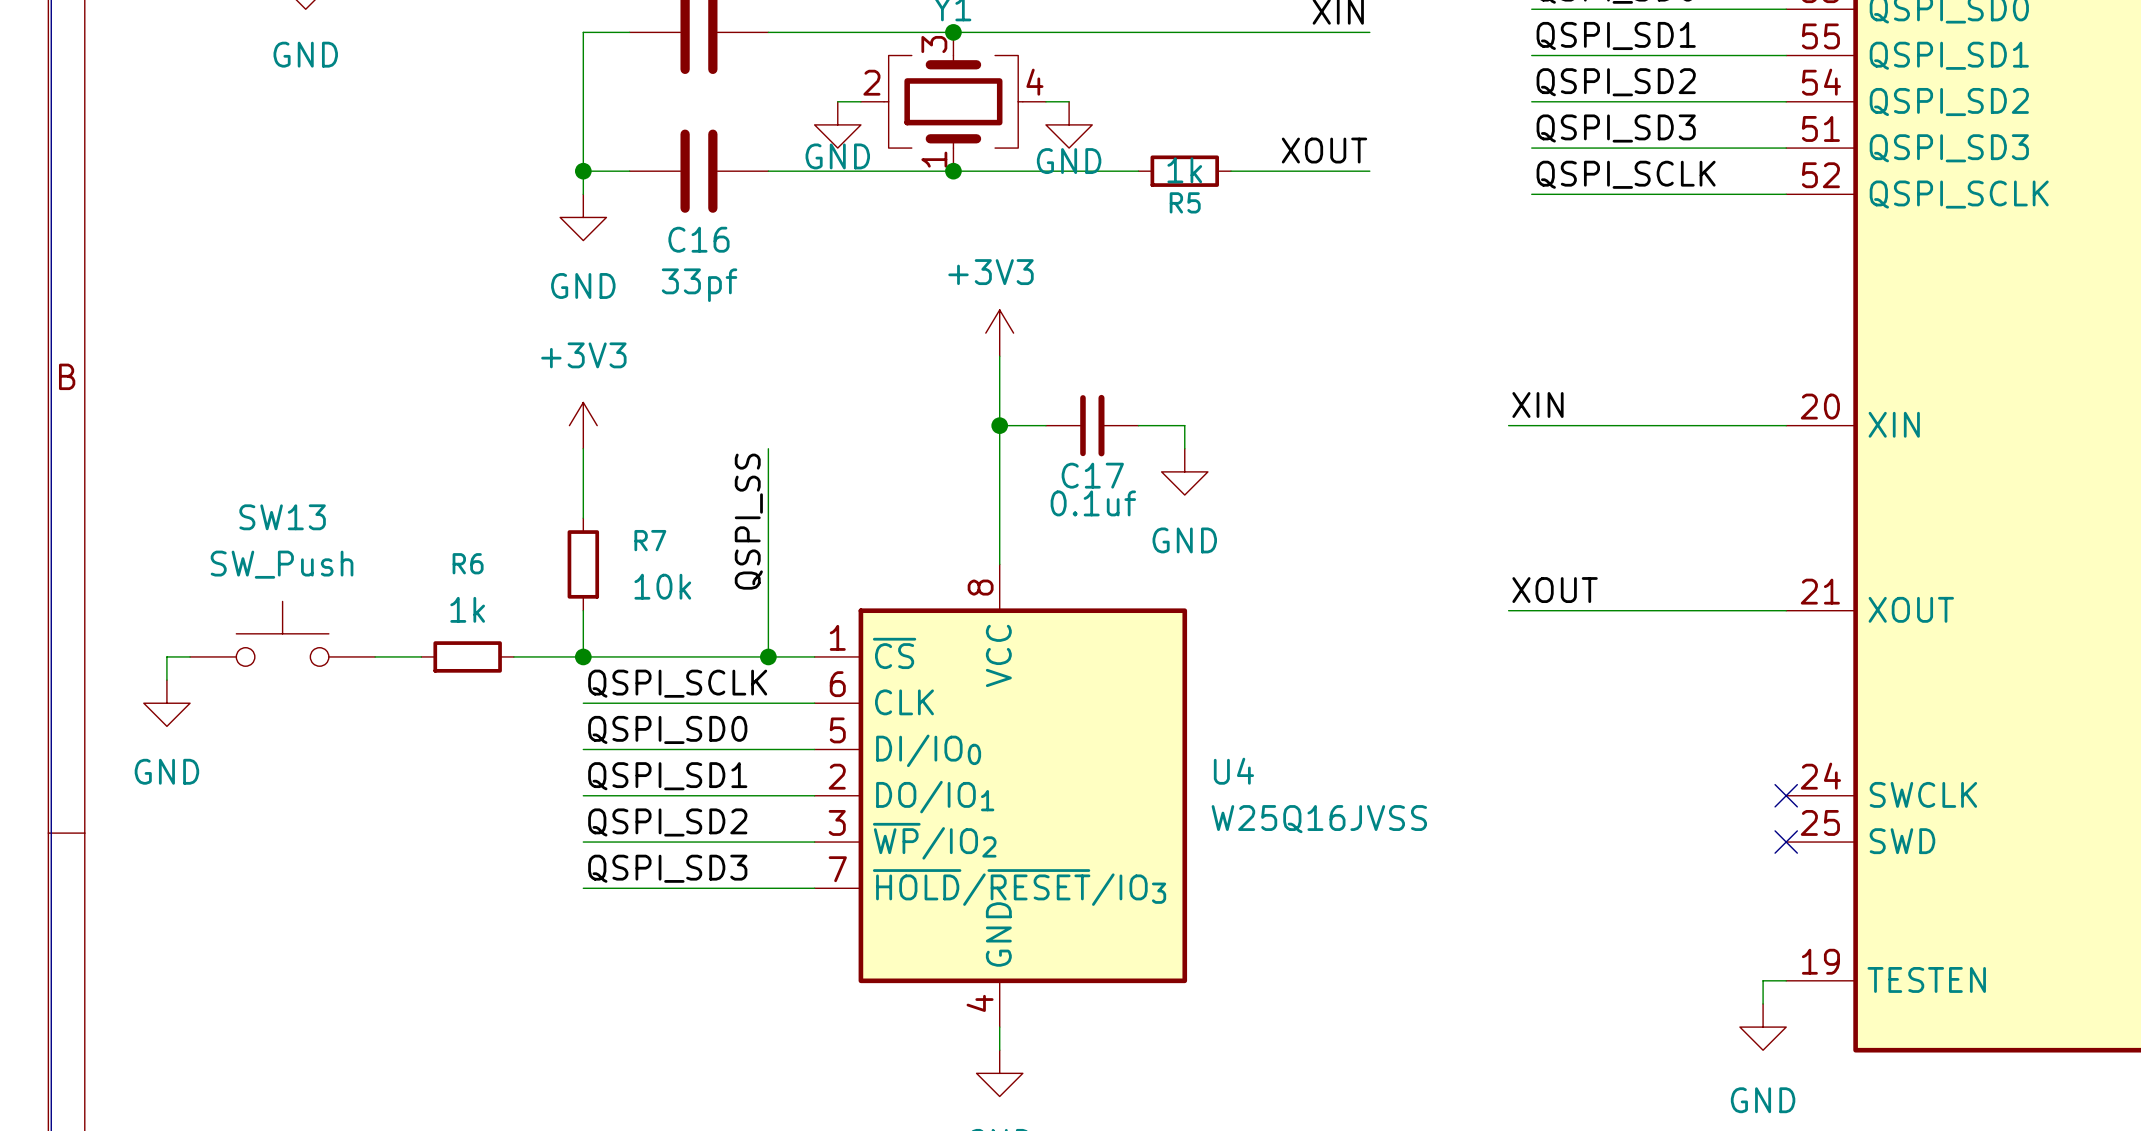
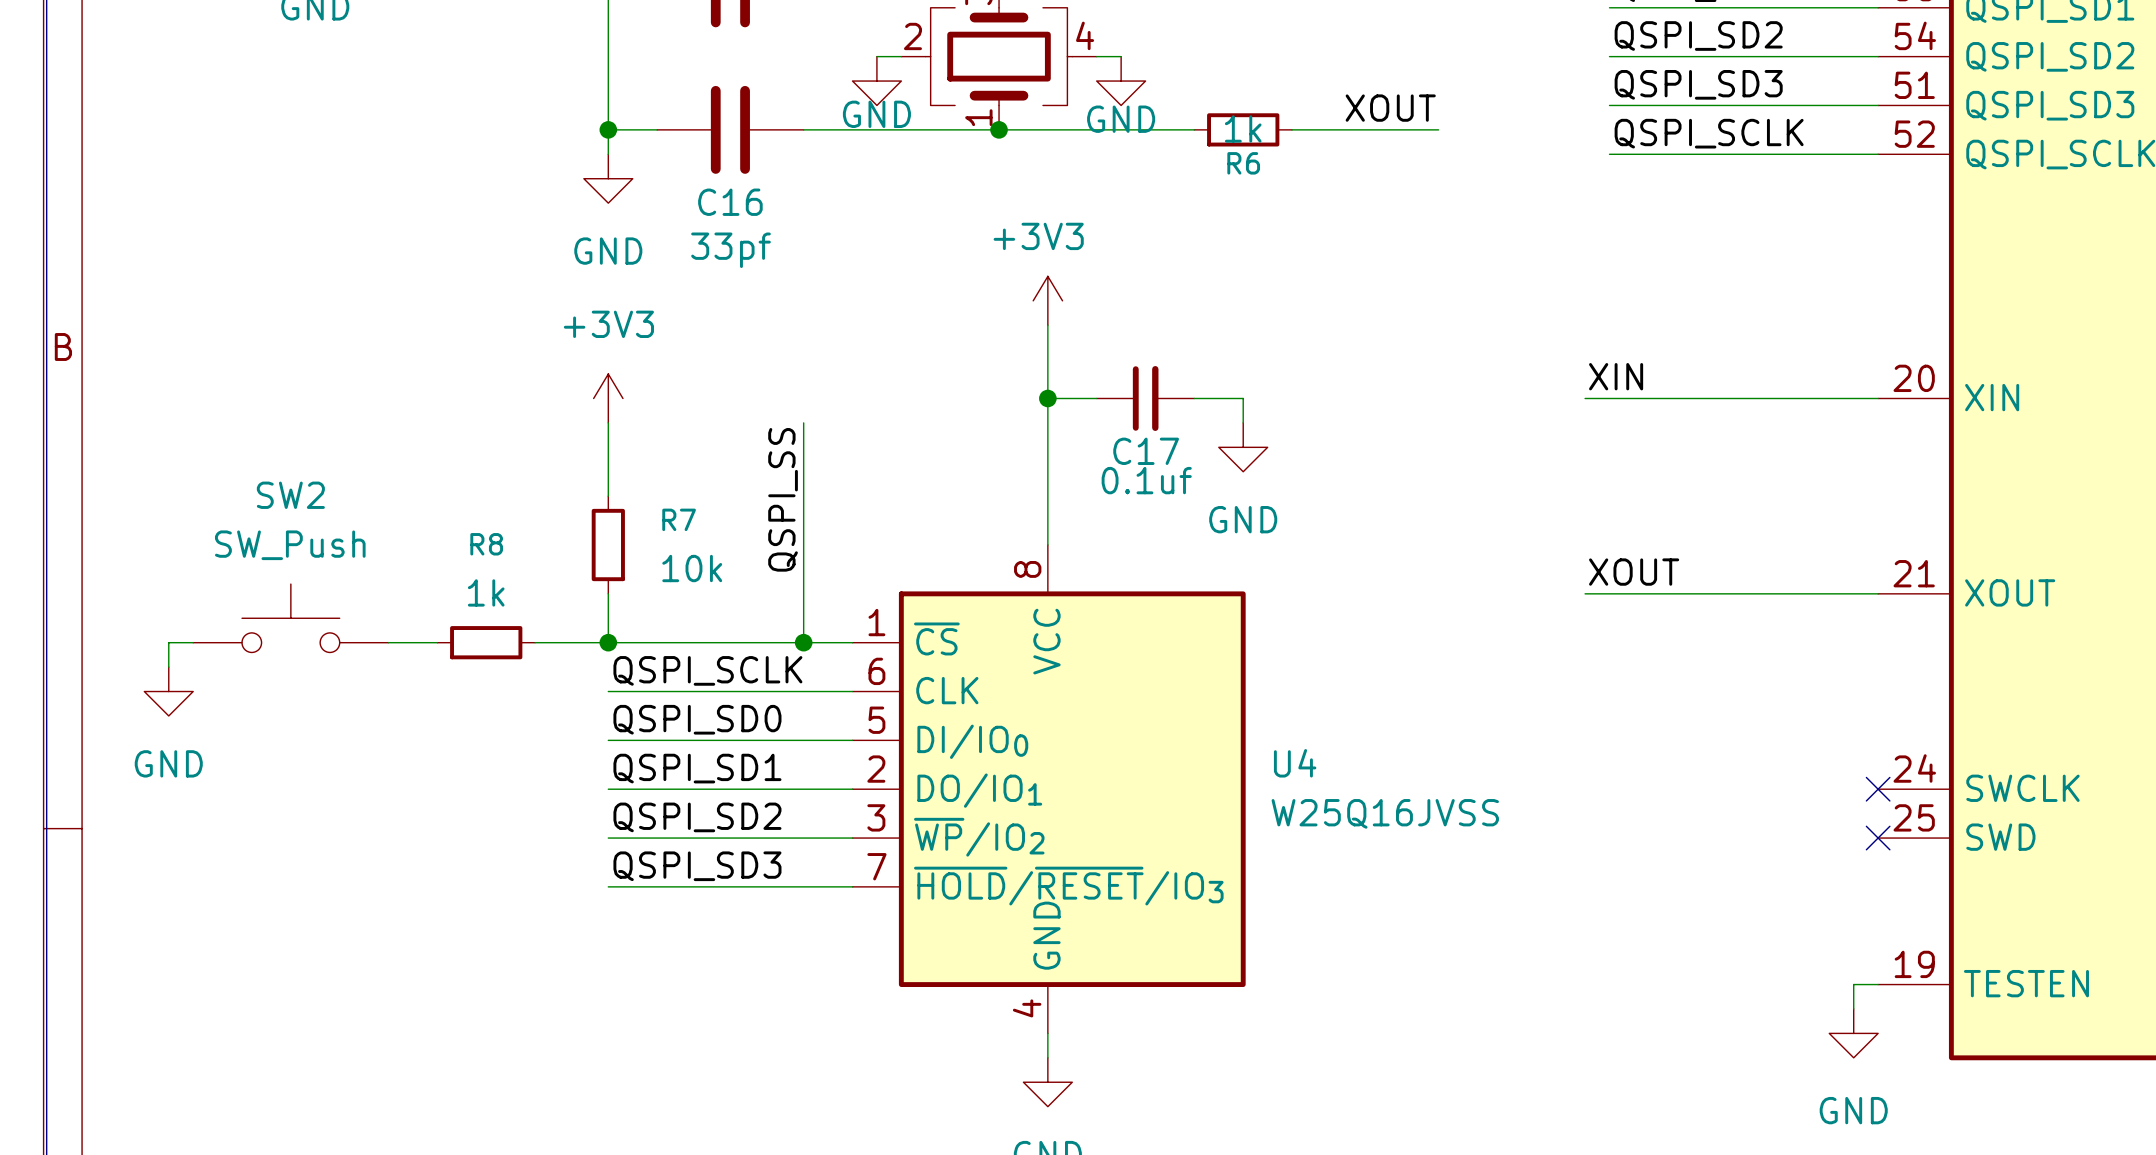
R5 name: R5 (1185, 202) -> R6 (1243, 163)
SW13 name: SW13 (282, 517) -> SW2 (290, 495)
R6 name: R6 (468, 563) -> R8 (486, 544)

